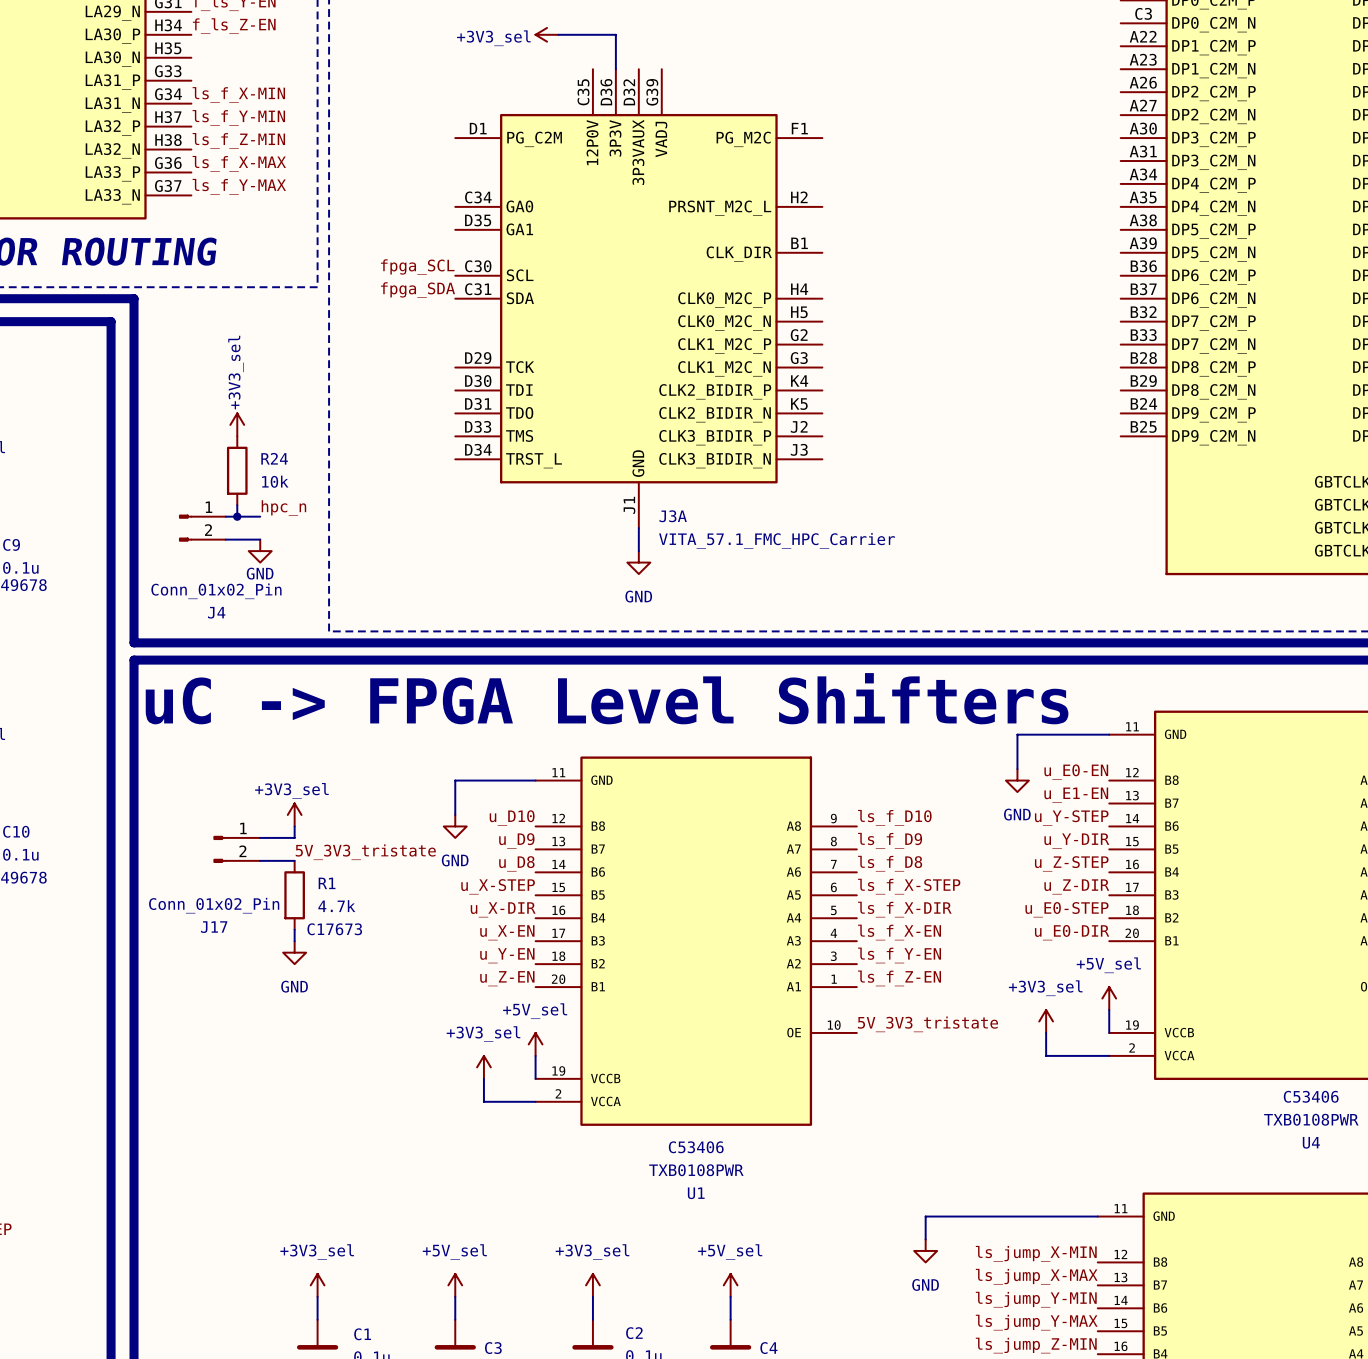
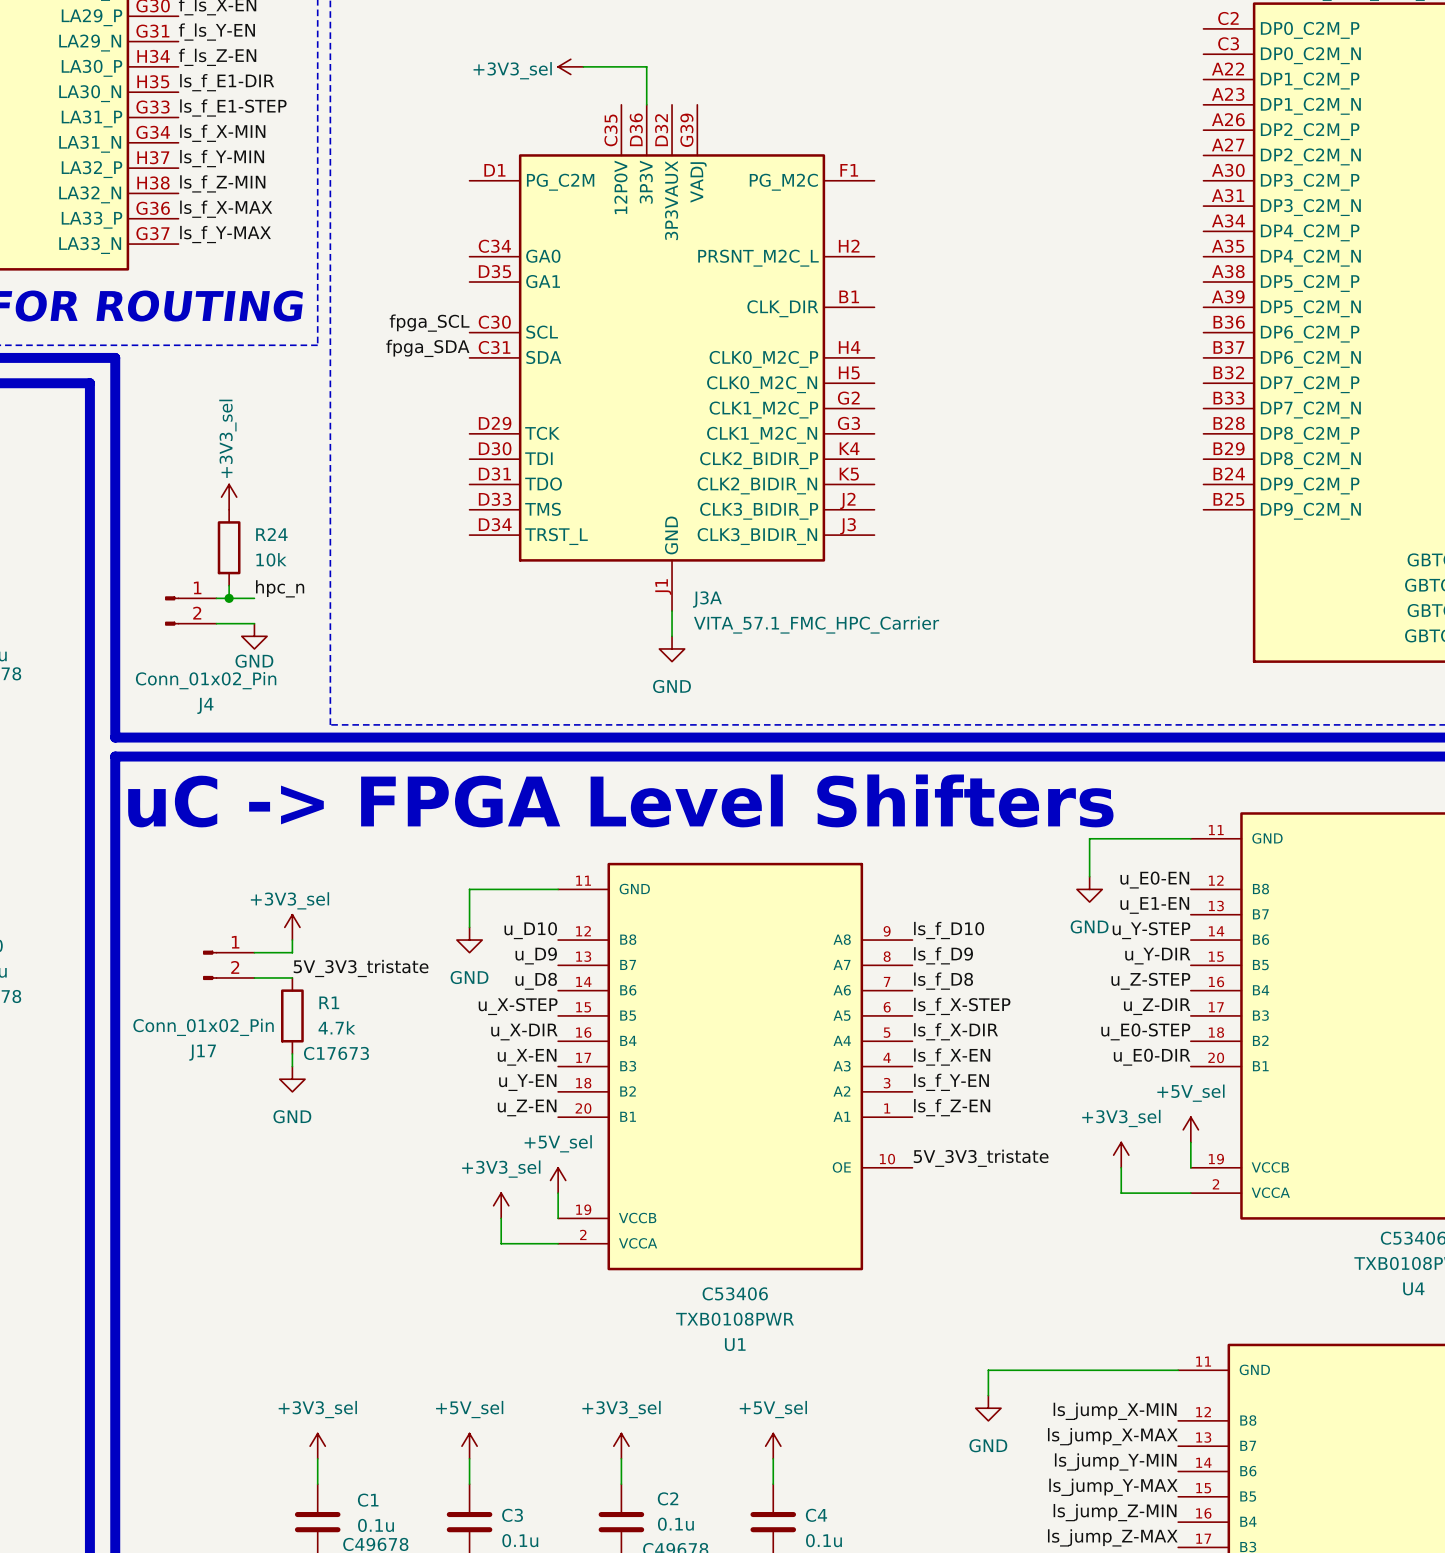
label: none -> ls_f_E1-DIR (227, 82)
label: none -> ls_f_E1-STEP (233, 107)

